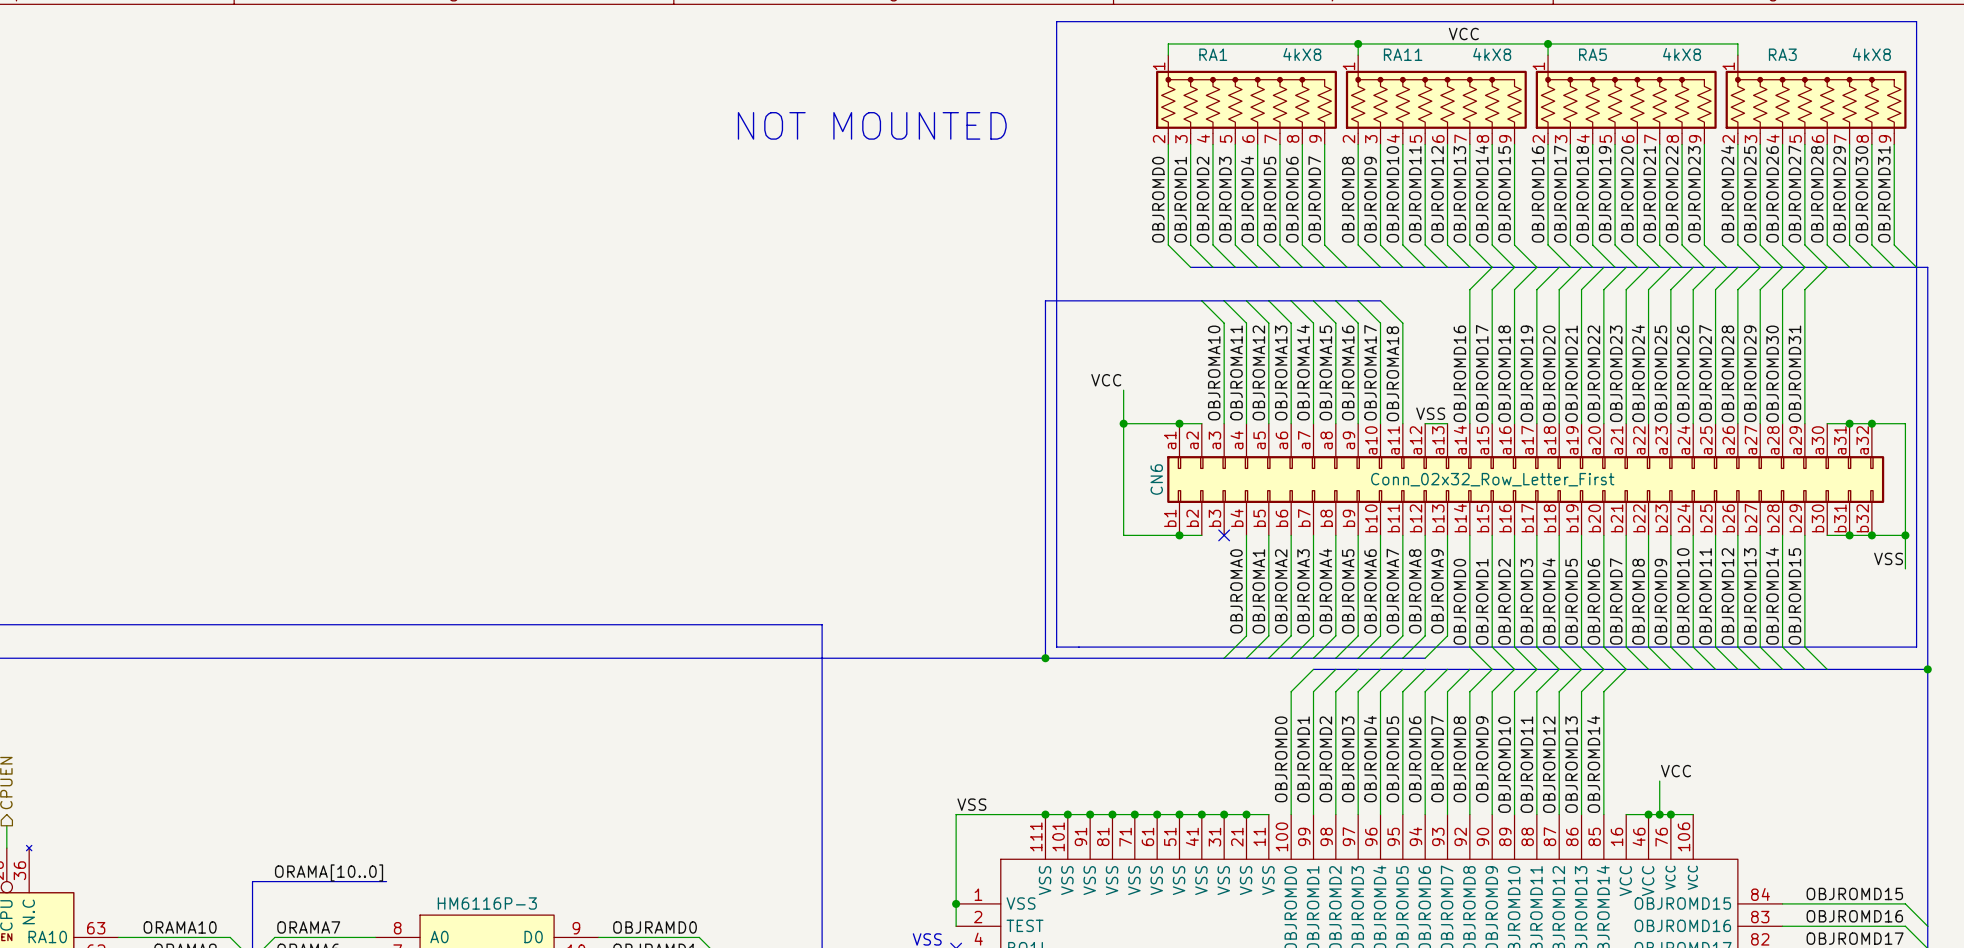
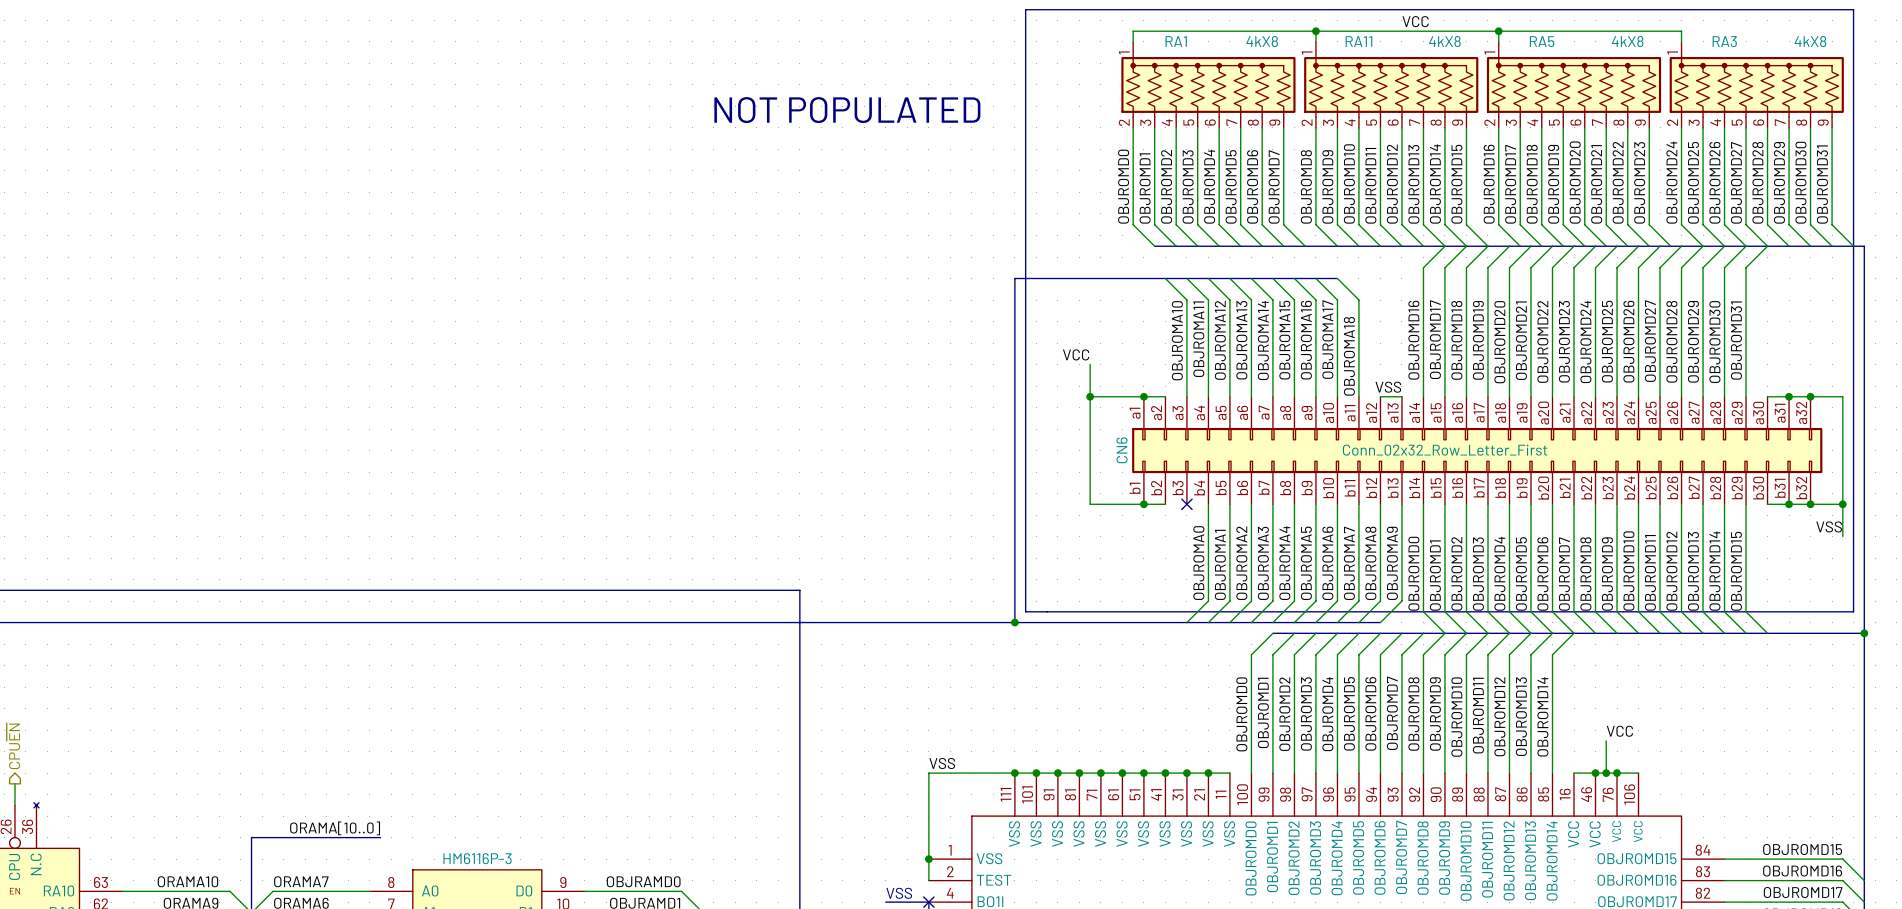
text: NOT MOUNTED (872, 125) -> NOT POPULATED (847, 110)

